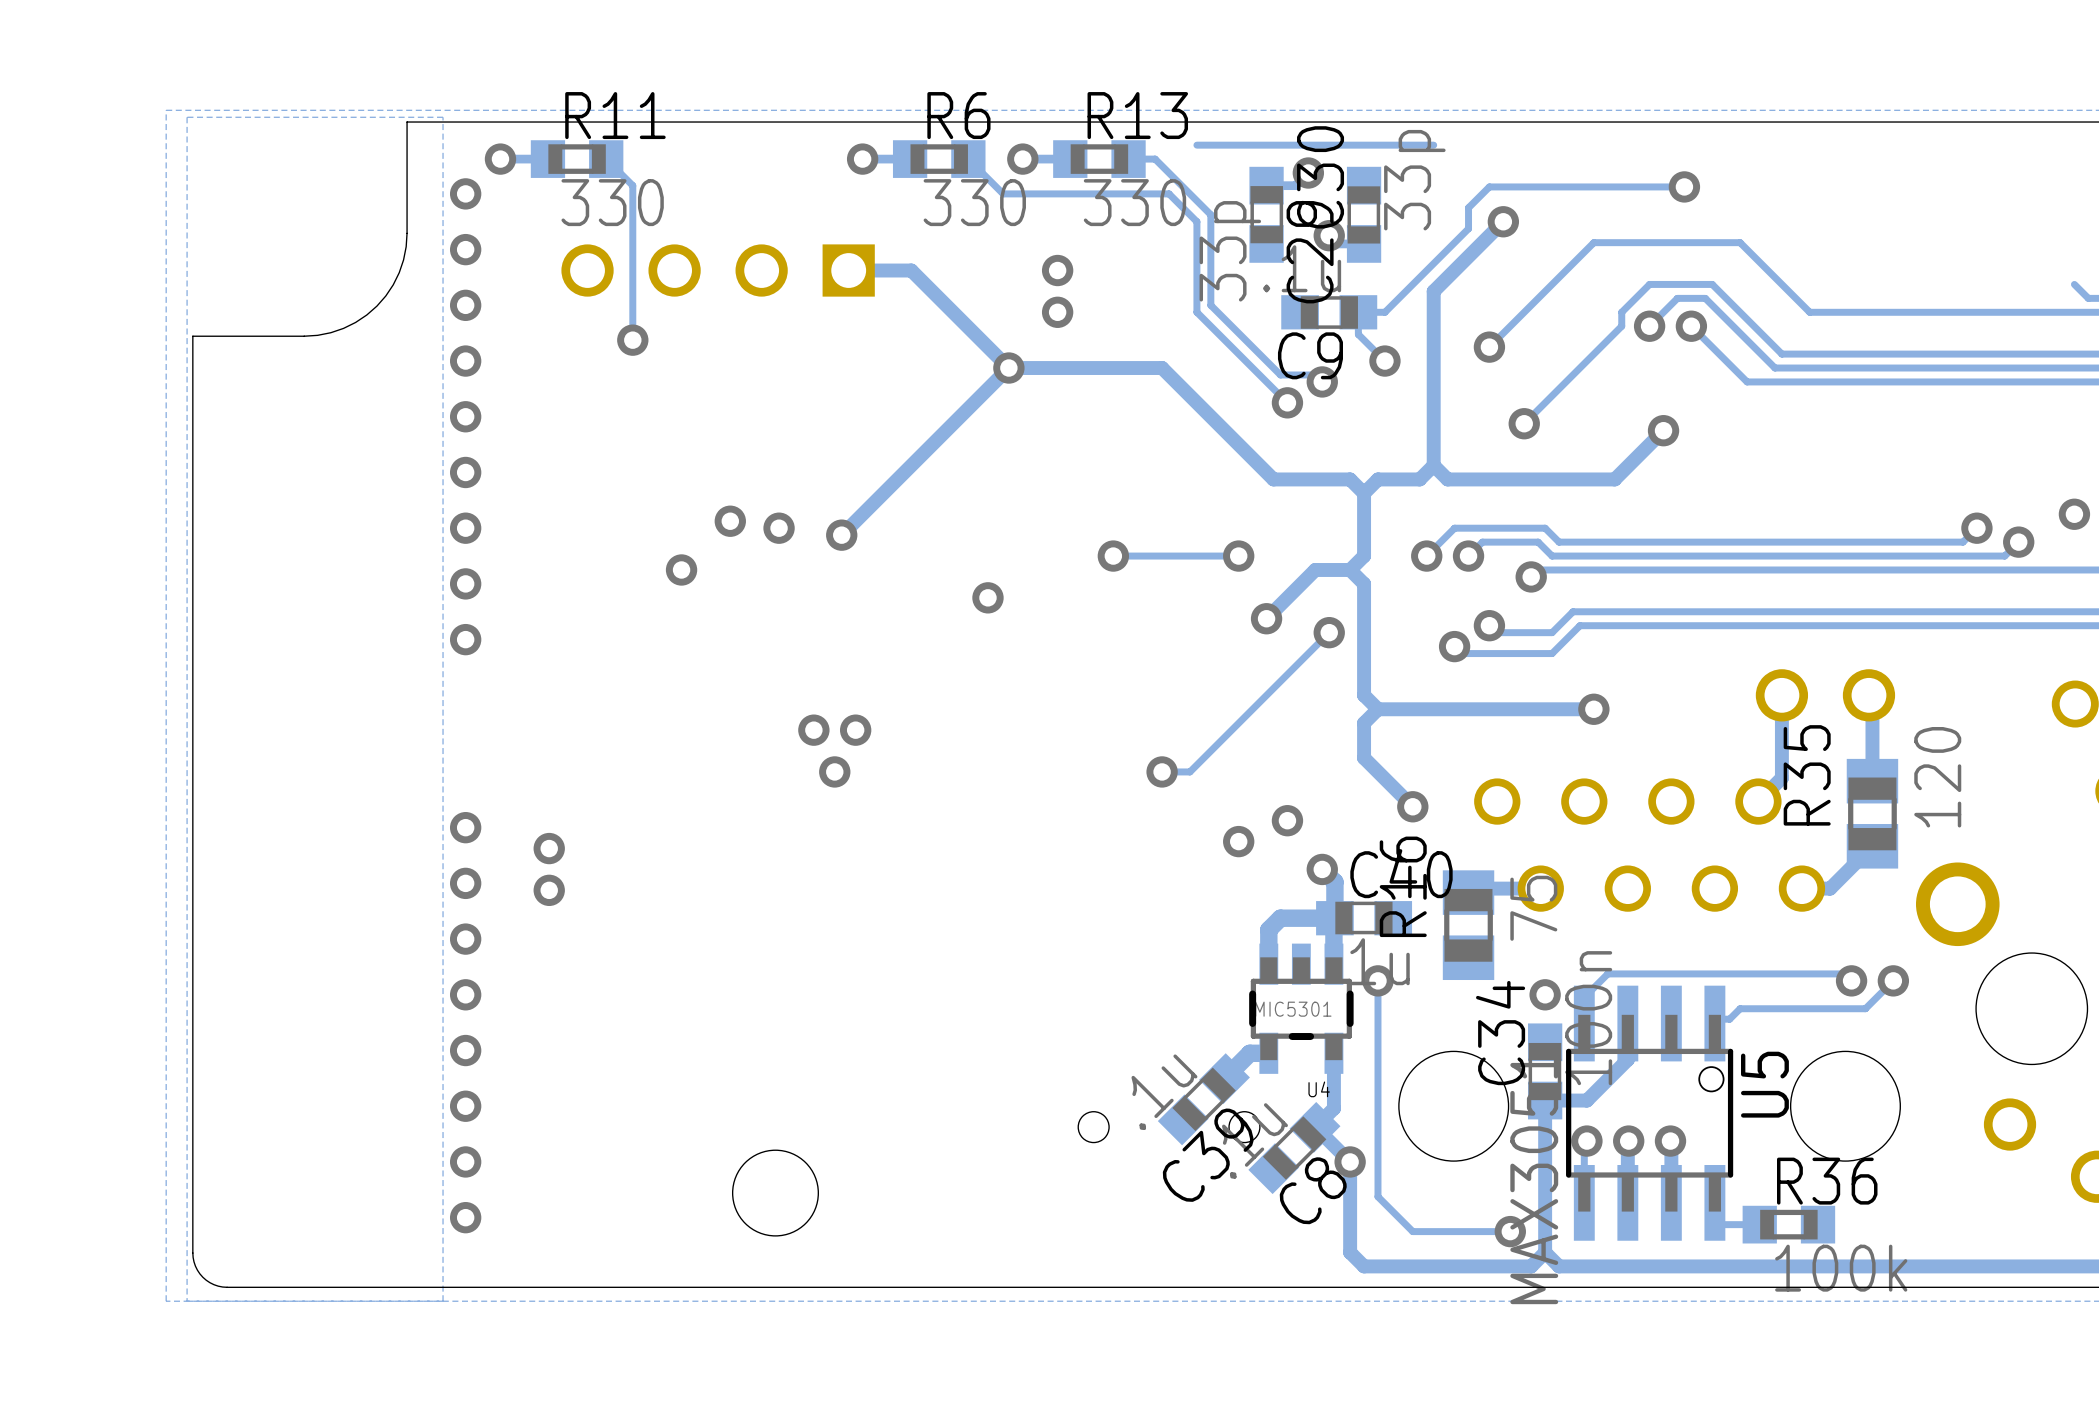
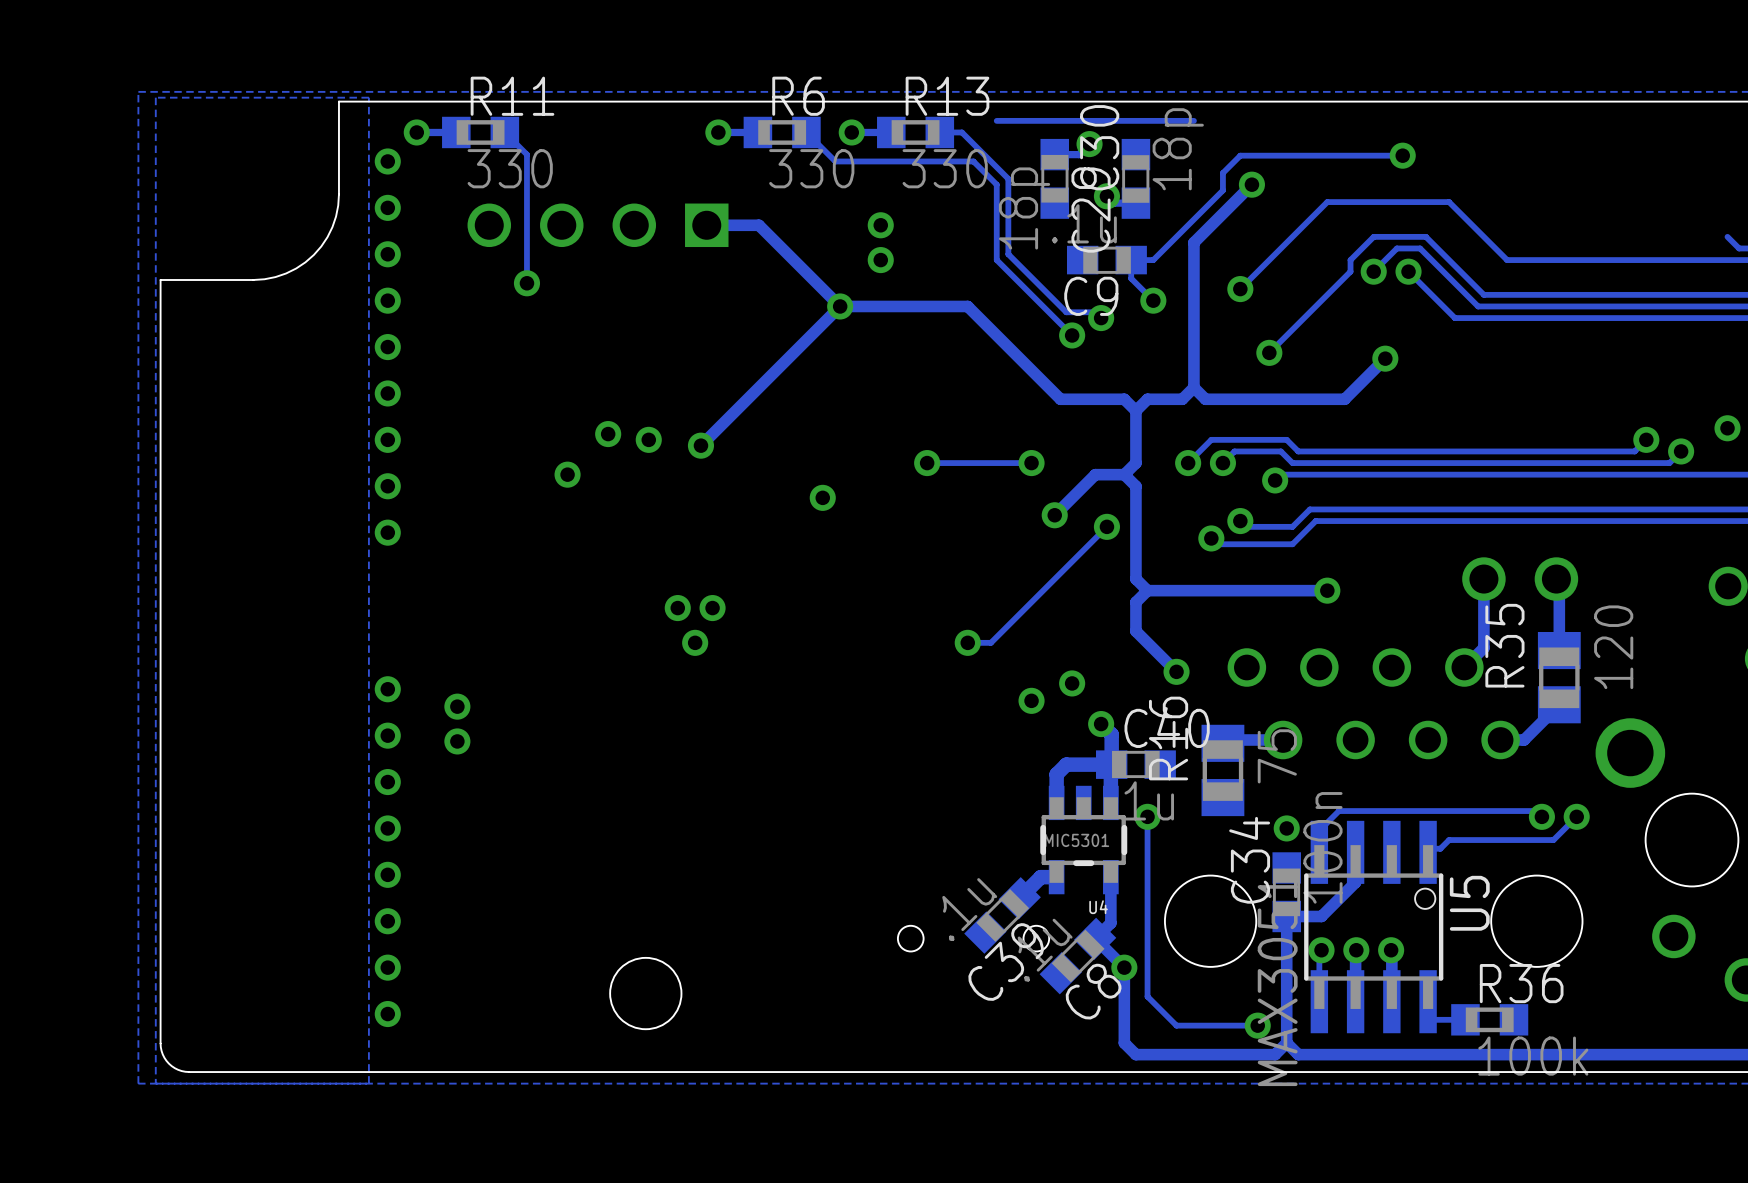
C30 value: 33p (1414, 180) -> 18p (1178, 149)
C29 value: 33p (1230, 251) -> 18p (1024, 208)

